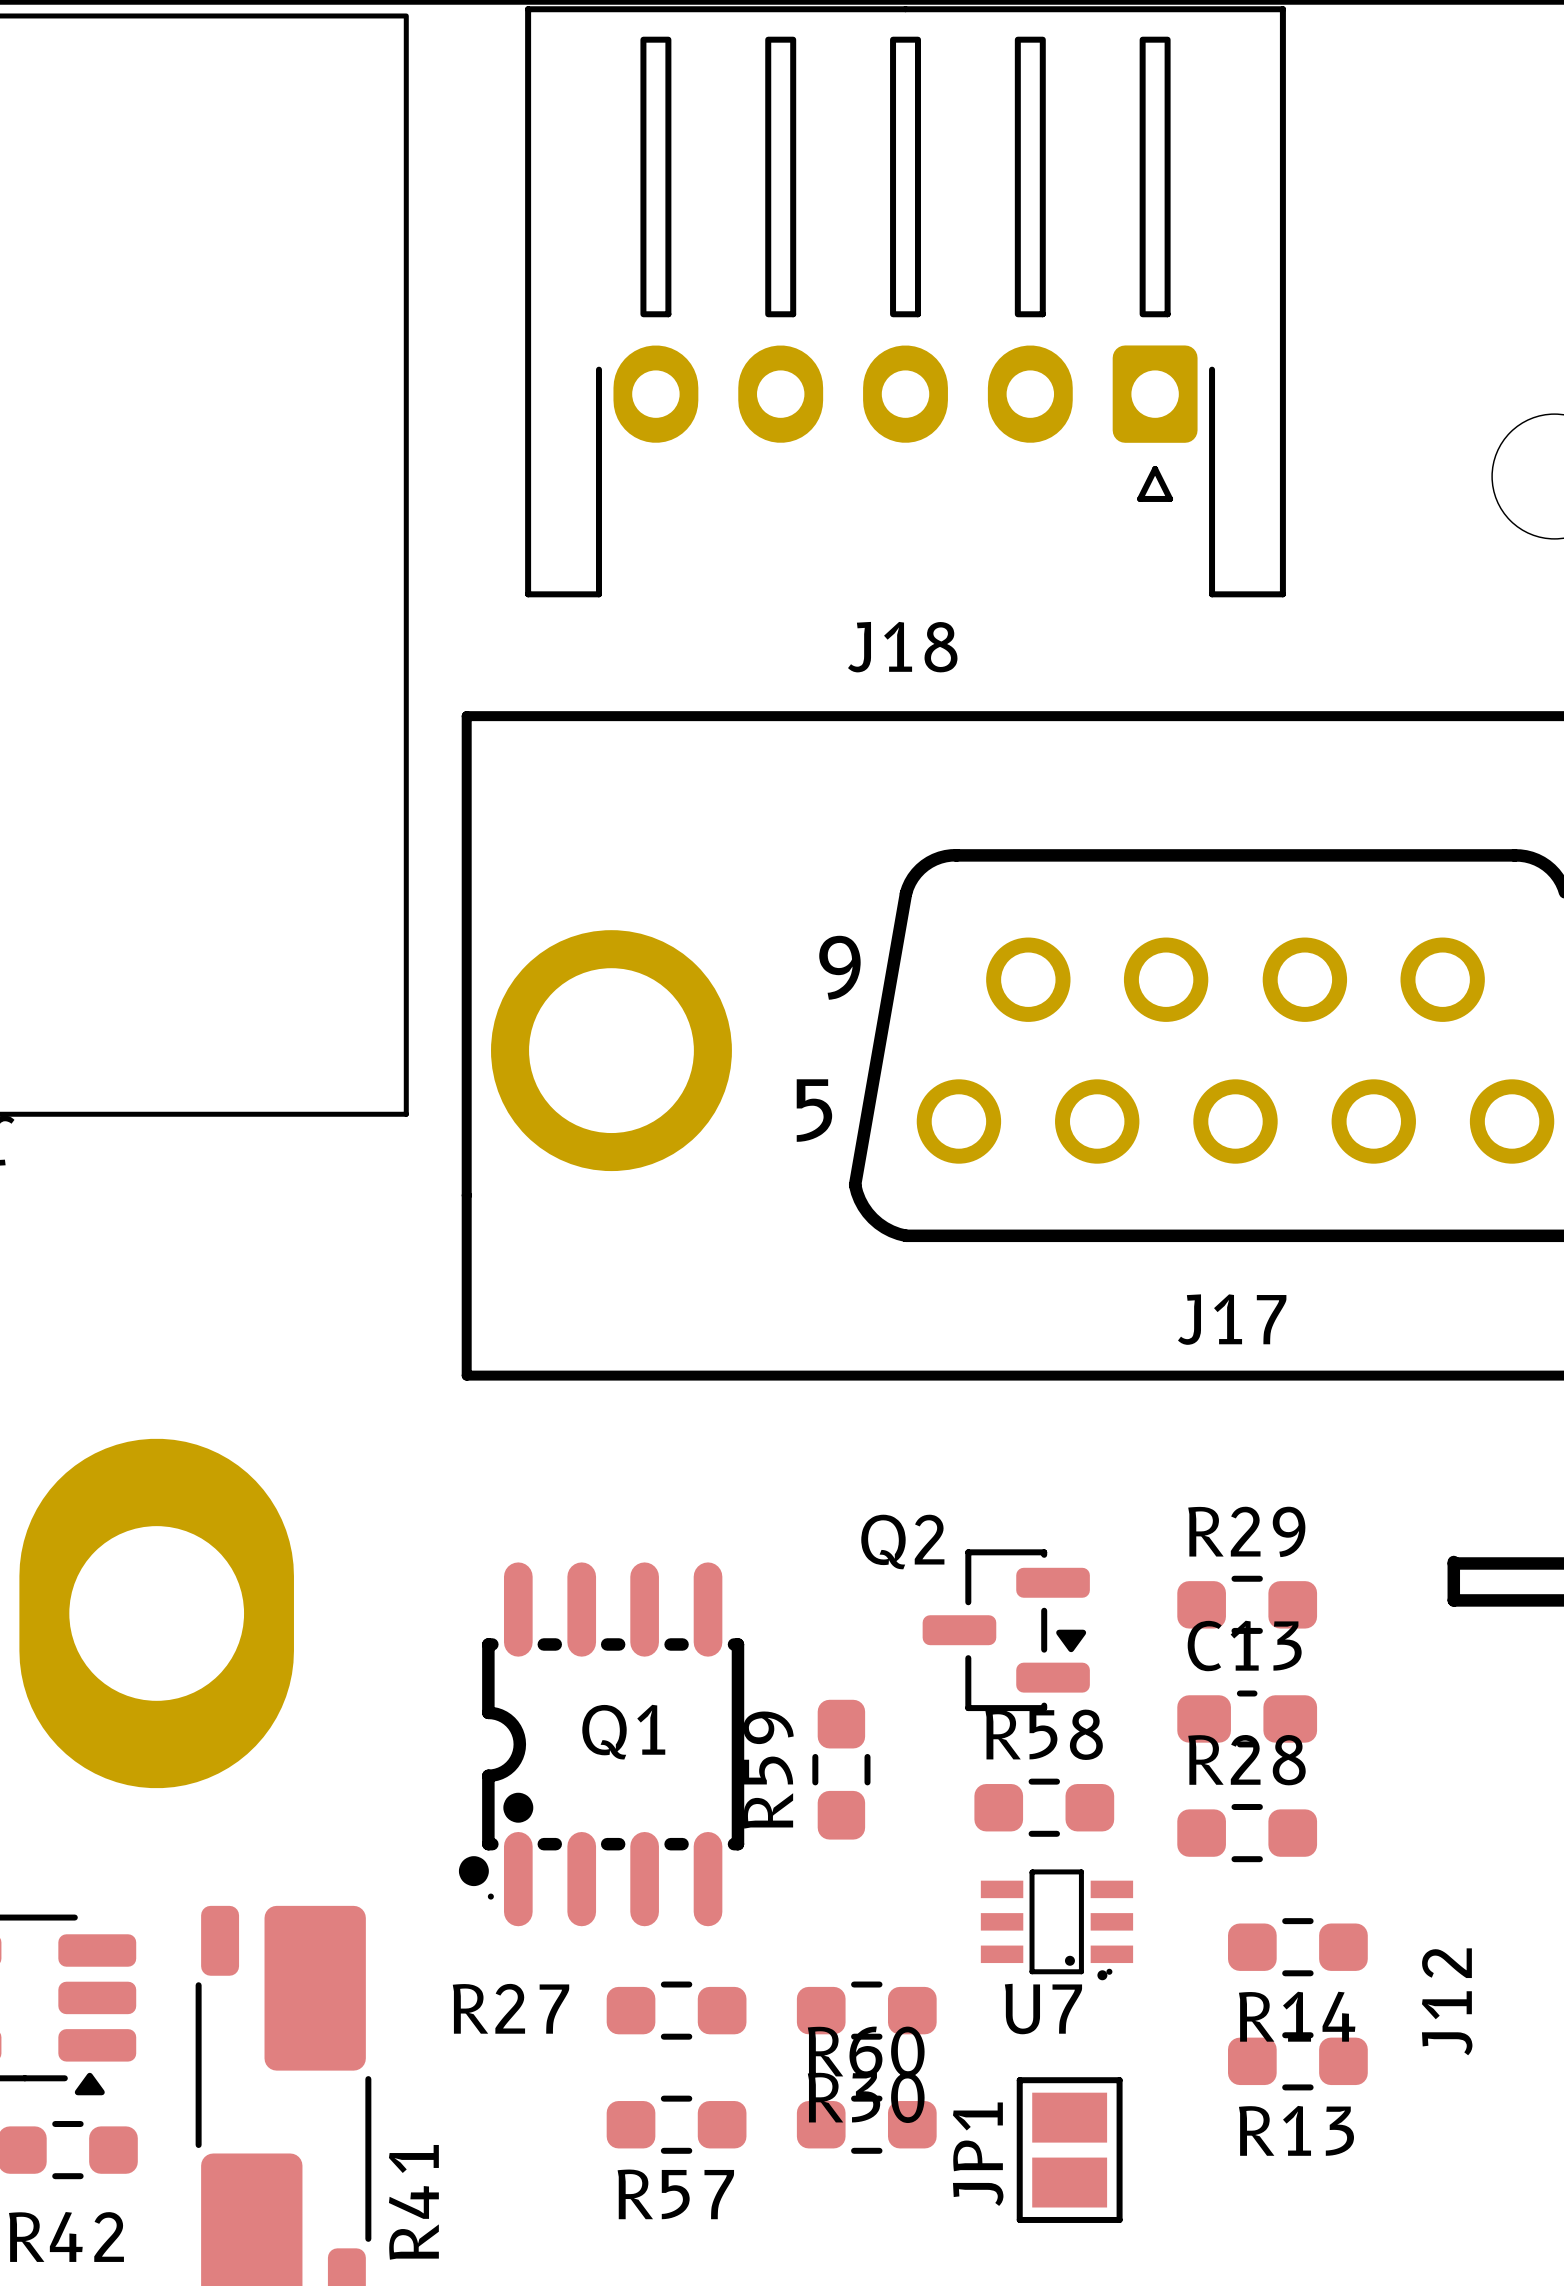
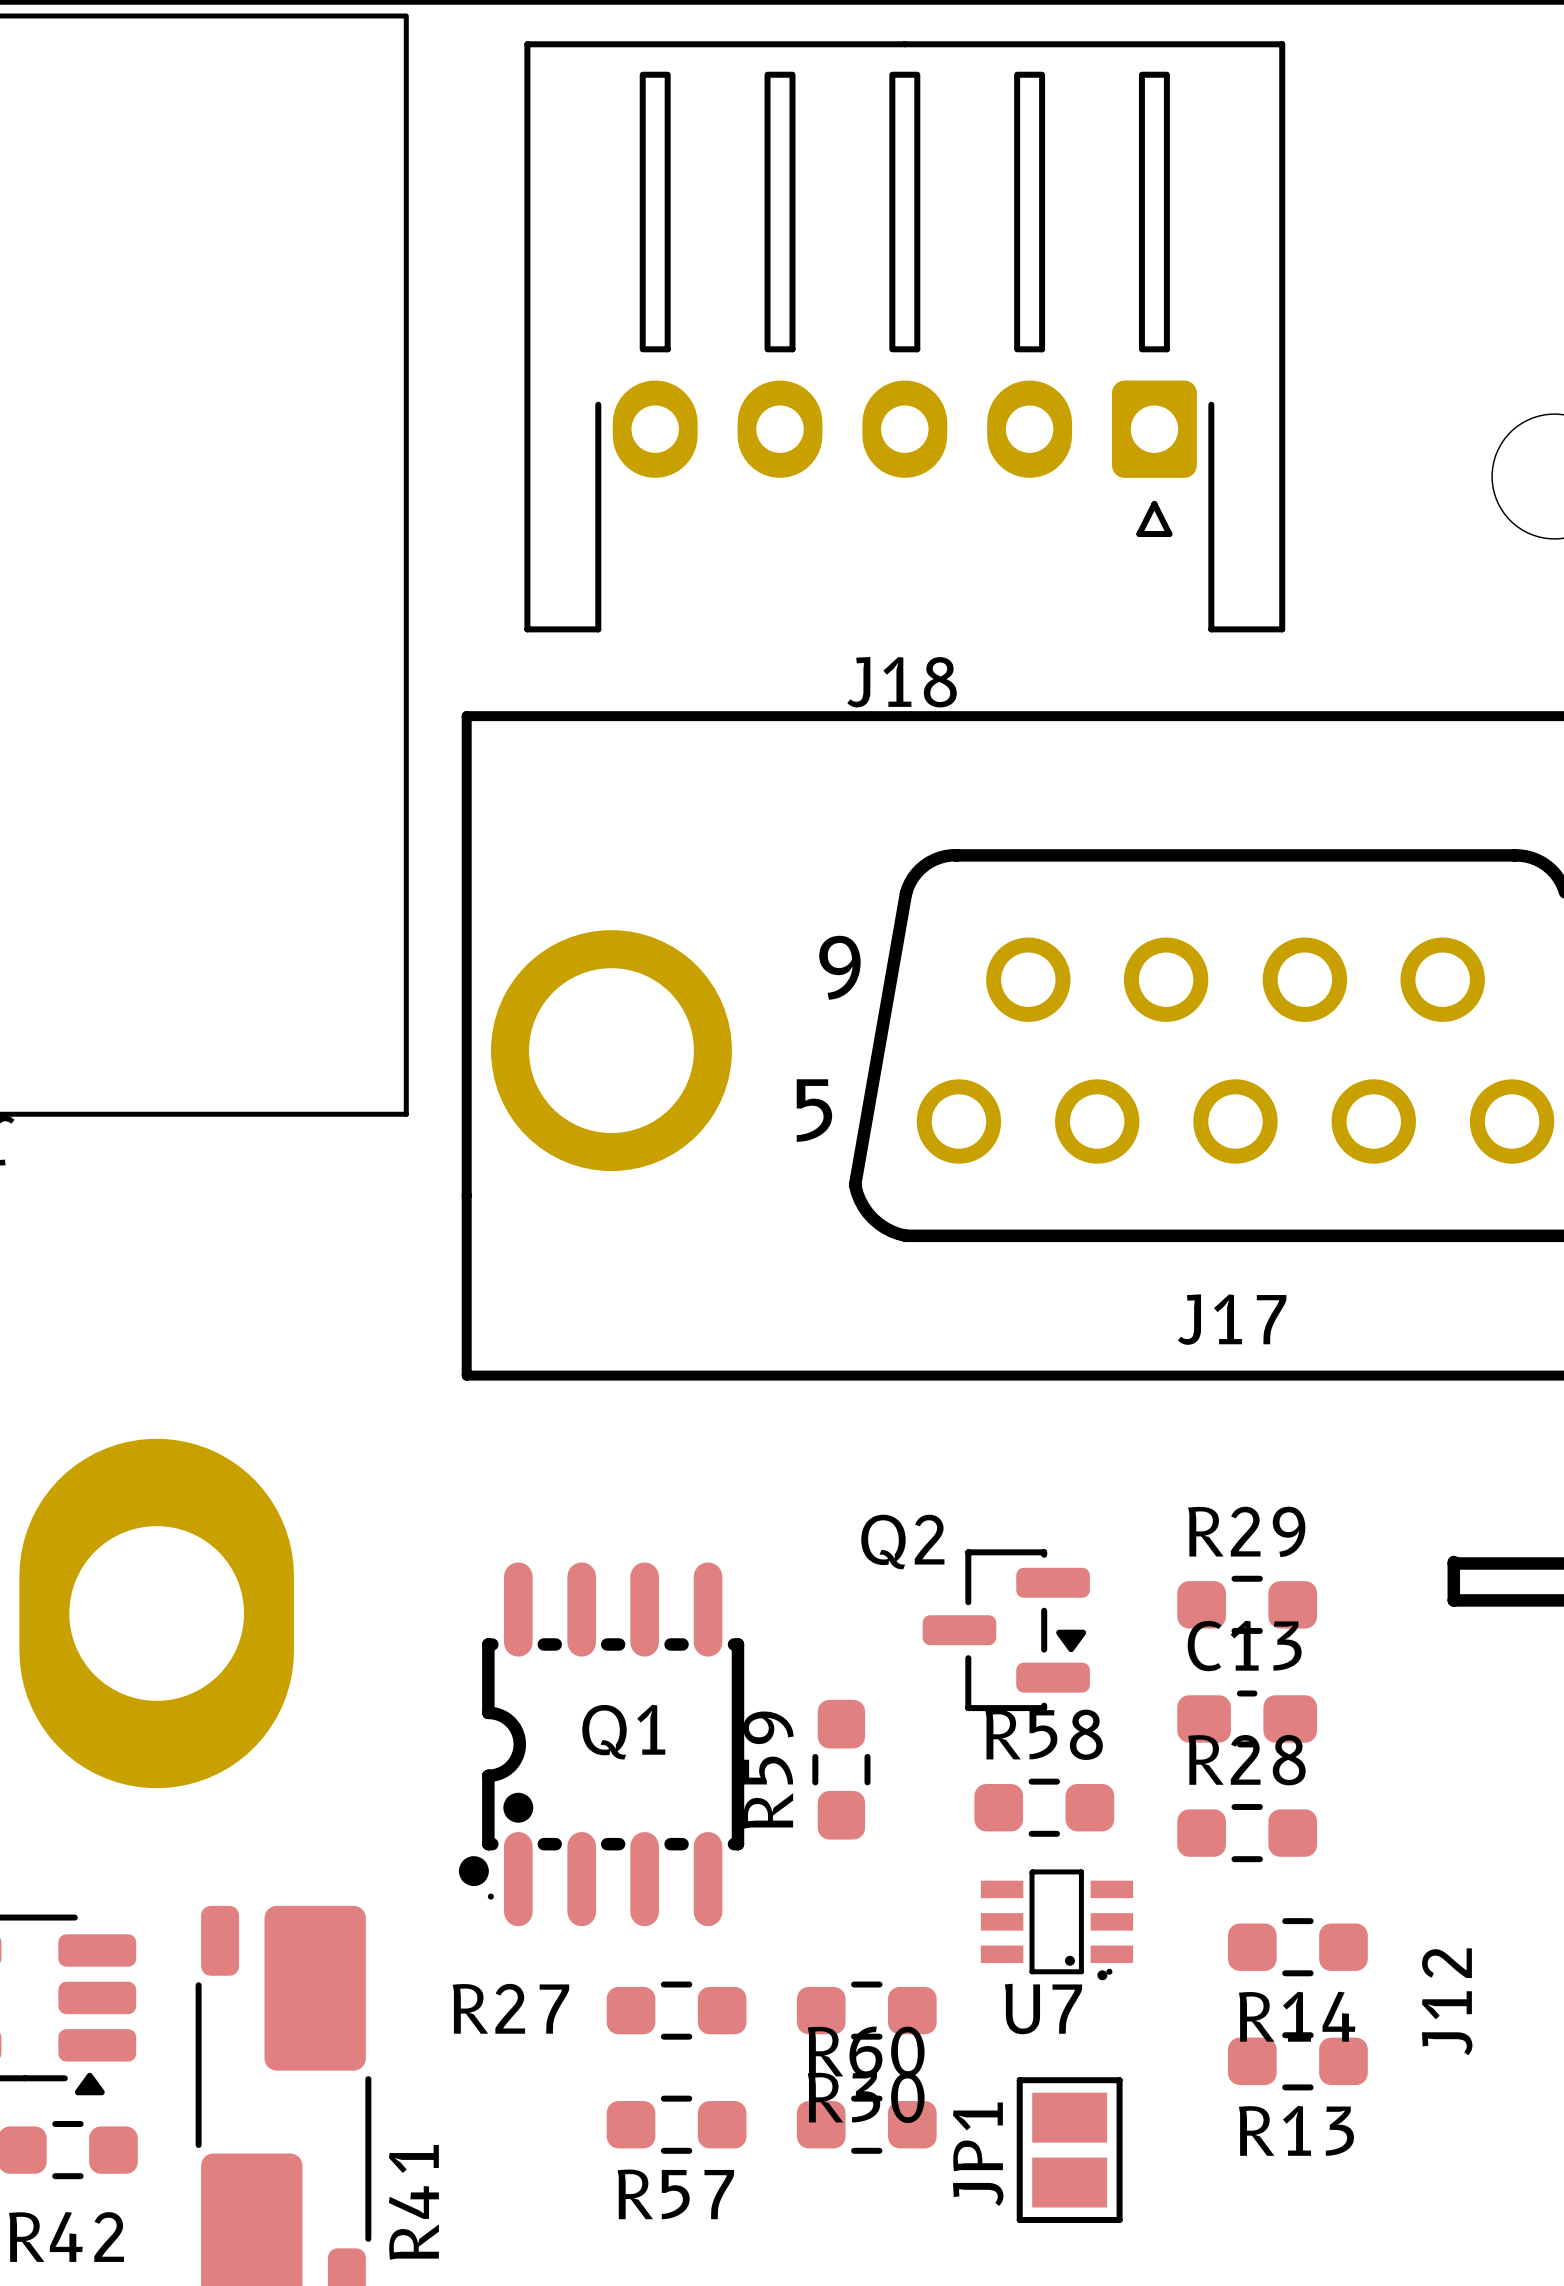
J18 position: (905, 301) -> (904, 336)

